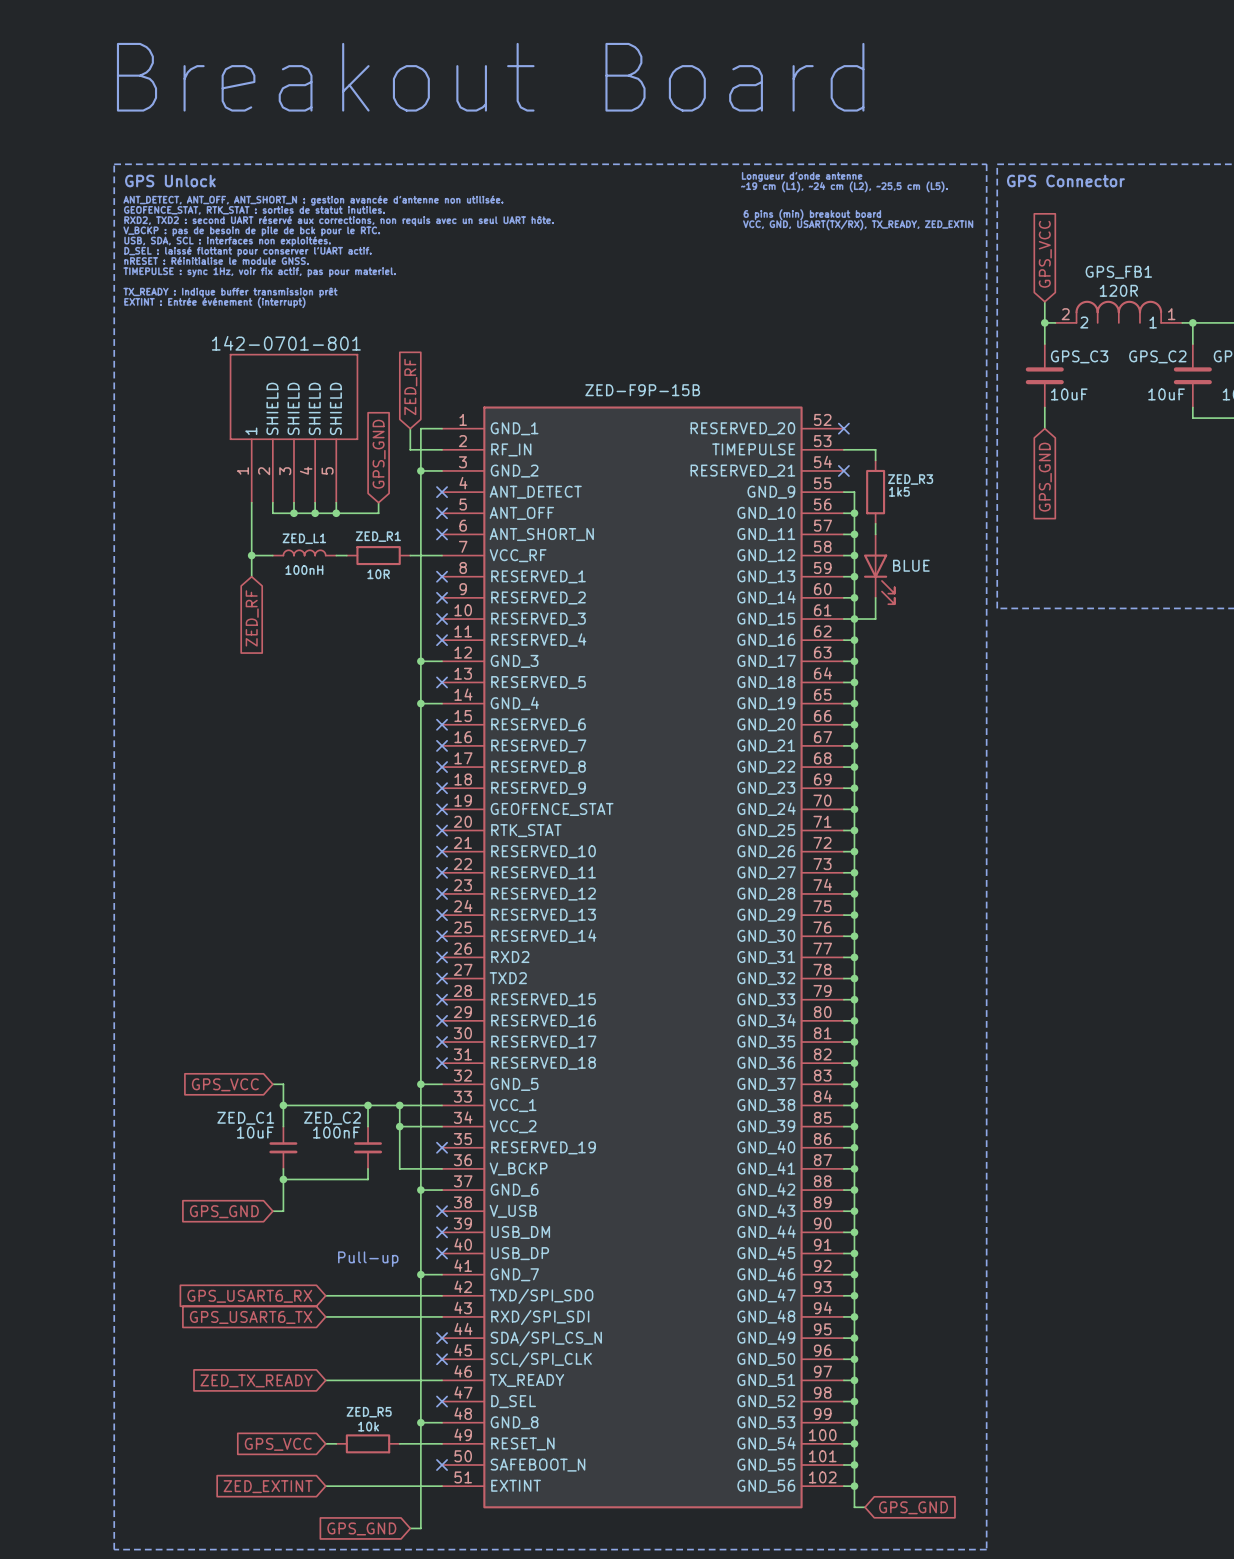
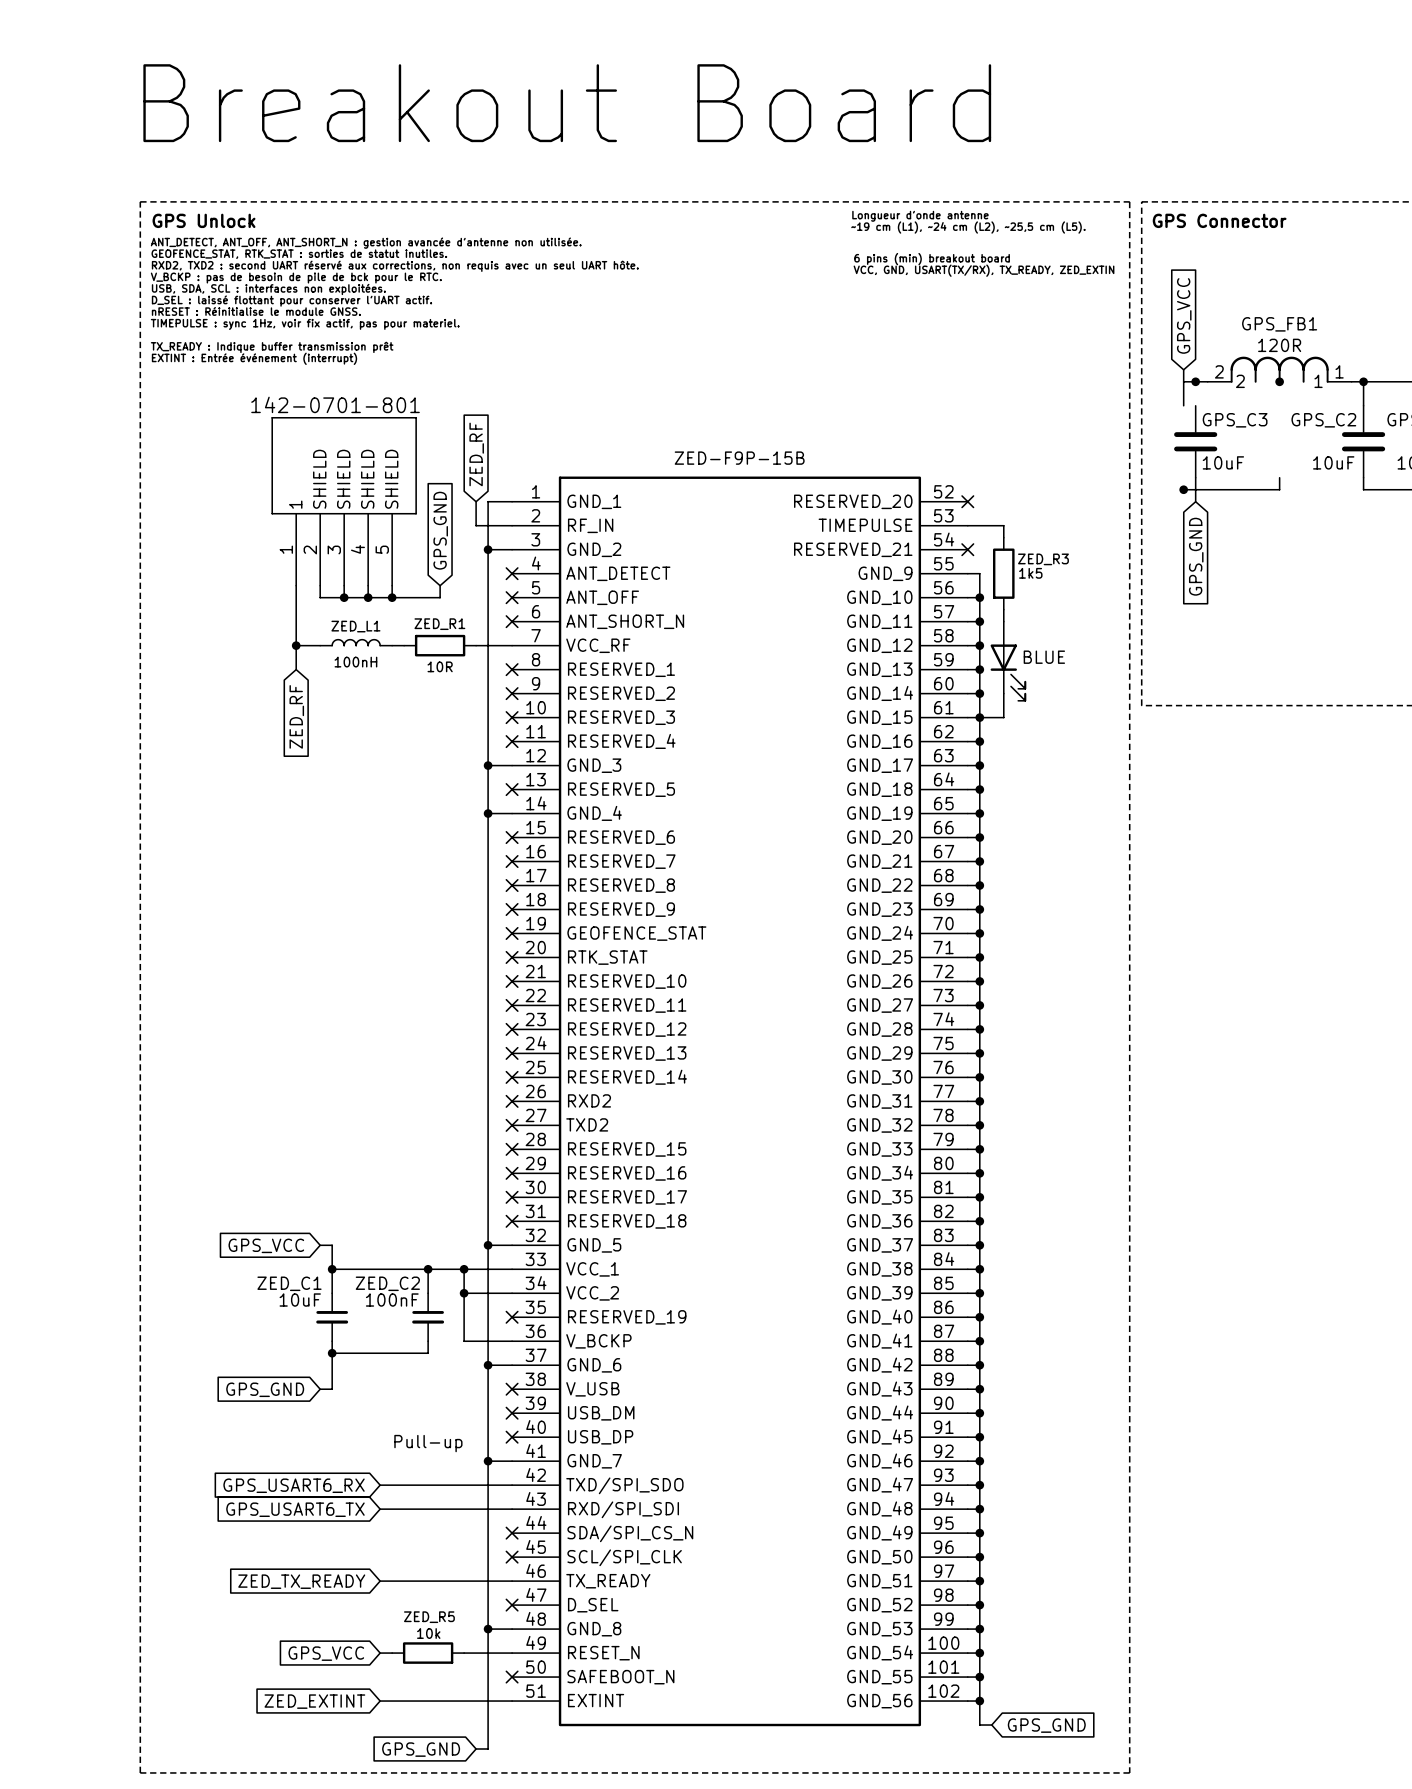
global label position: GPS_VCC (1045, 254) -> GPS_VCC (1184, 315)
wire: (1044, 301) (1044, 344) -> none
wire: none -> (1183, 369) (1183, 405)
wire: none -> (1183, 381) (1195, 381)
junction: none -> (1279, 381)
wire: none -> (1279, 477) (1279, 489) (1183, 489)
junction: none -> (1183, 489)

